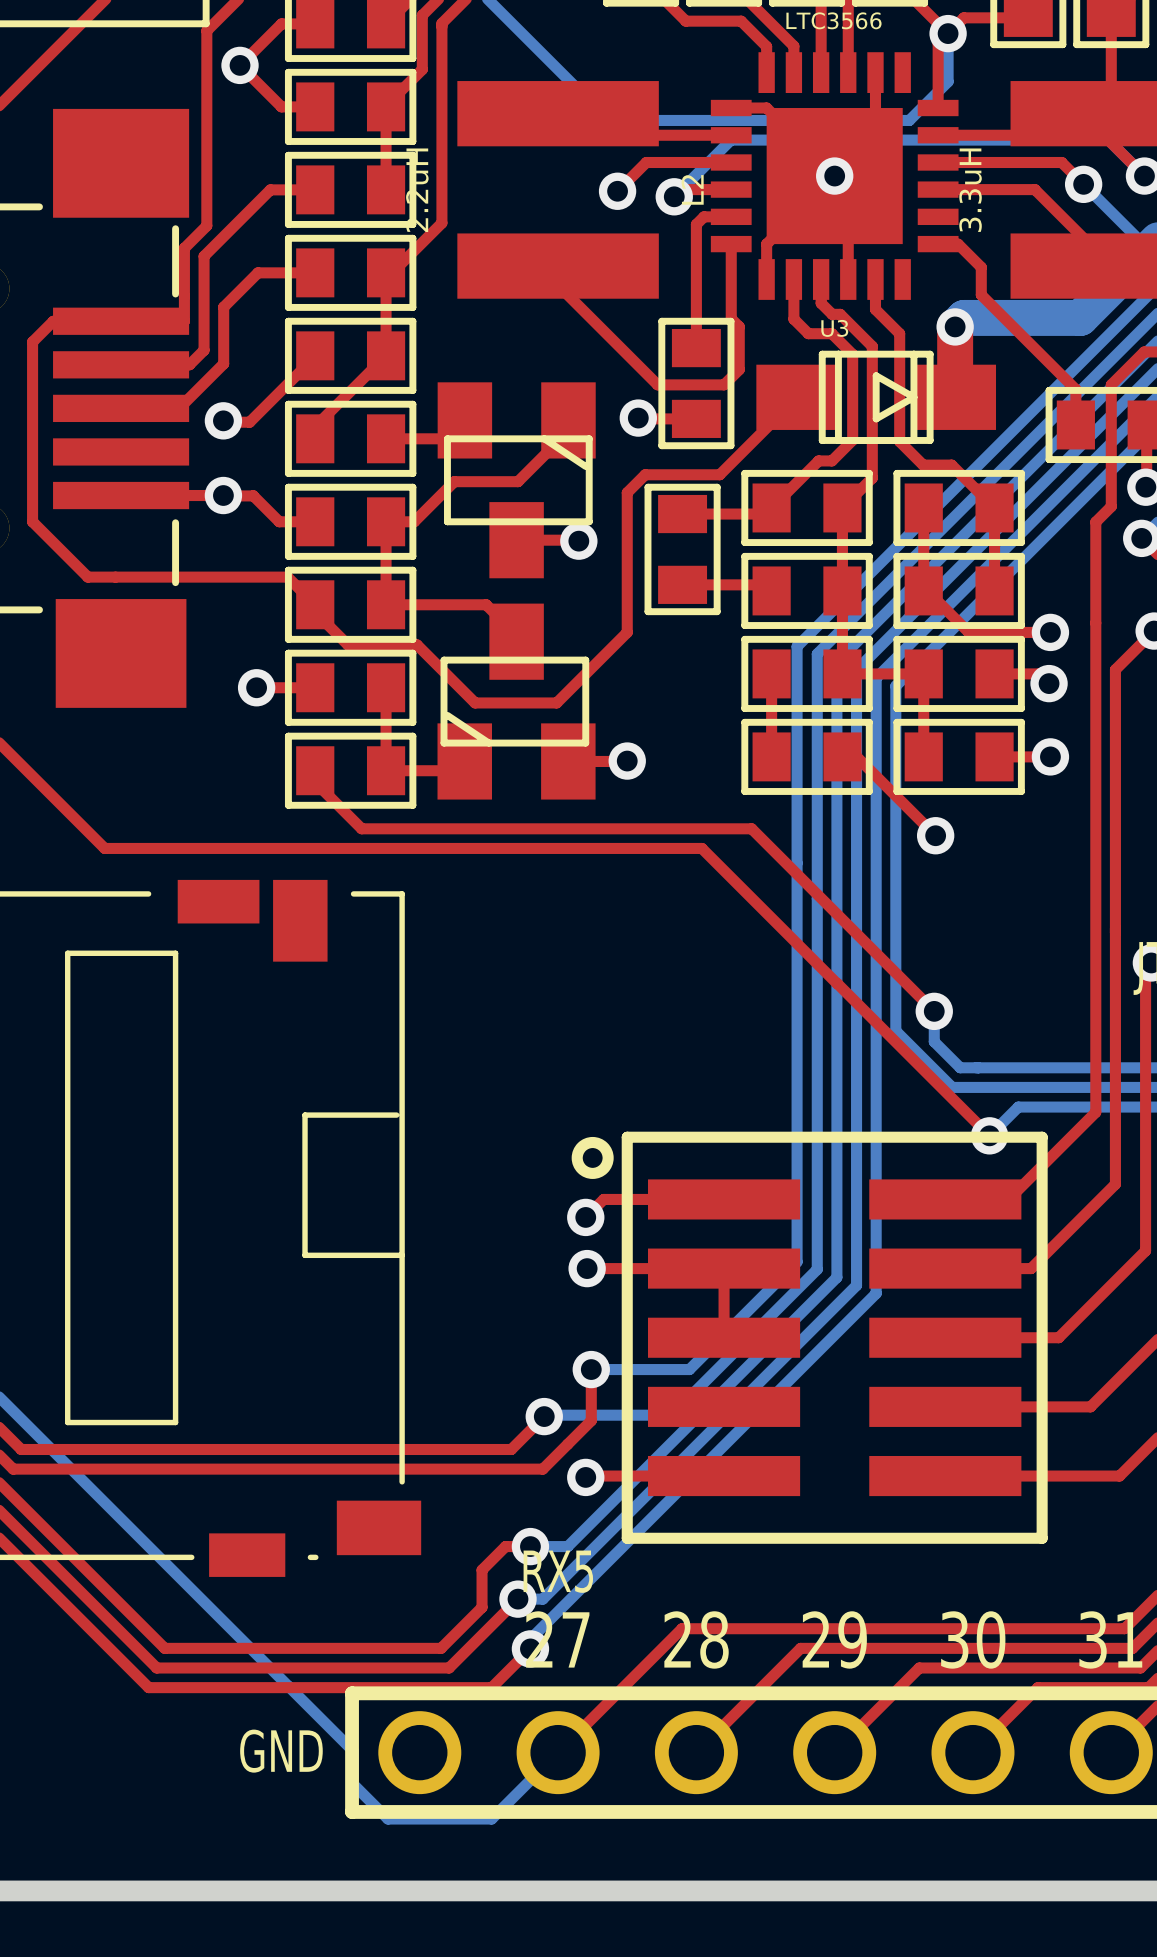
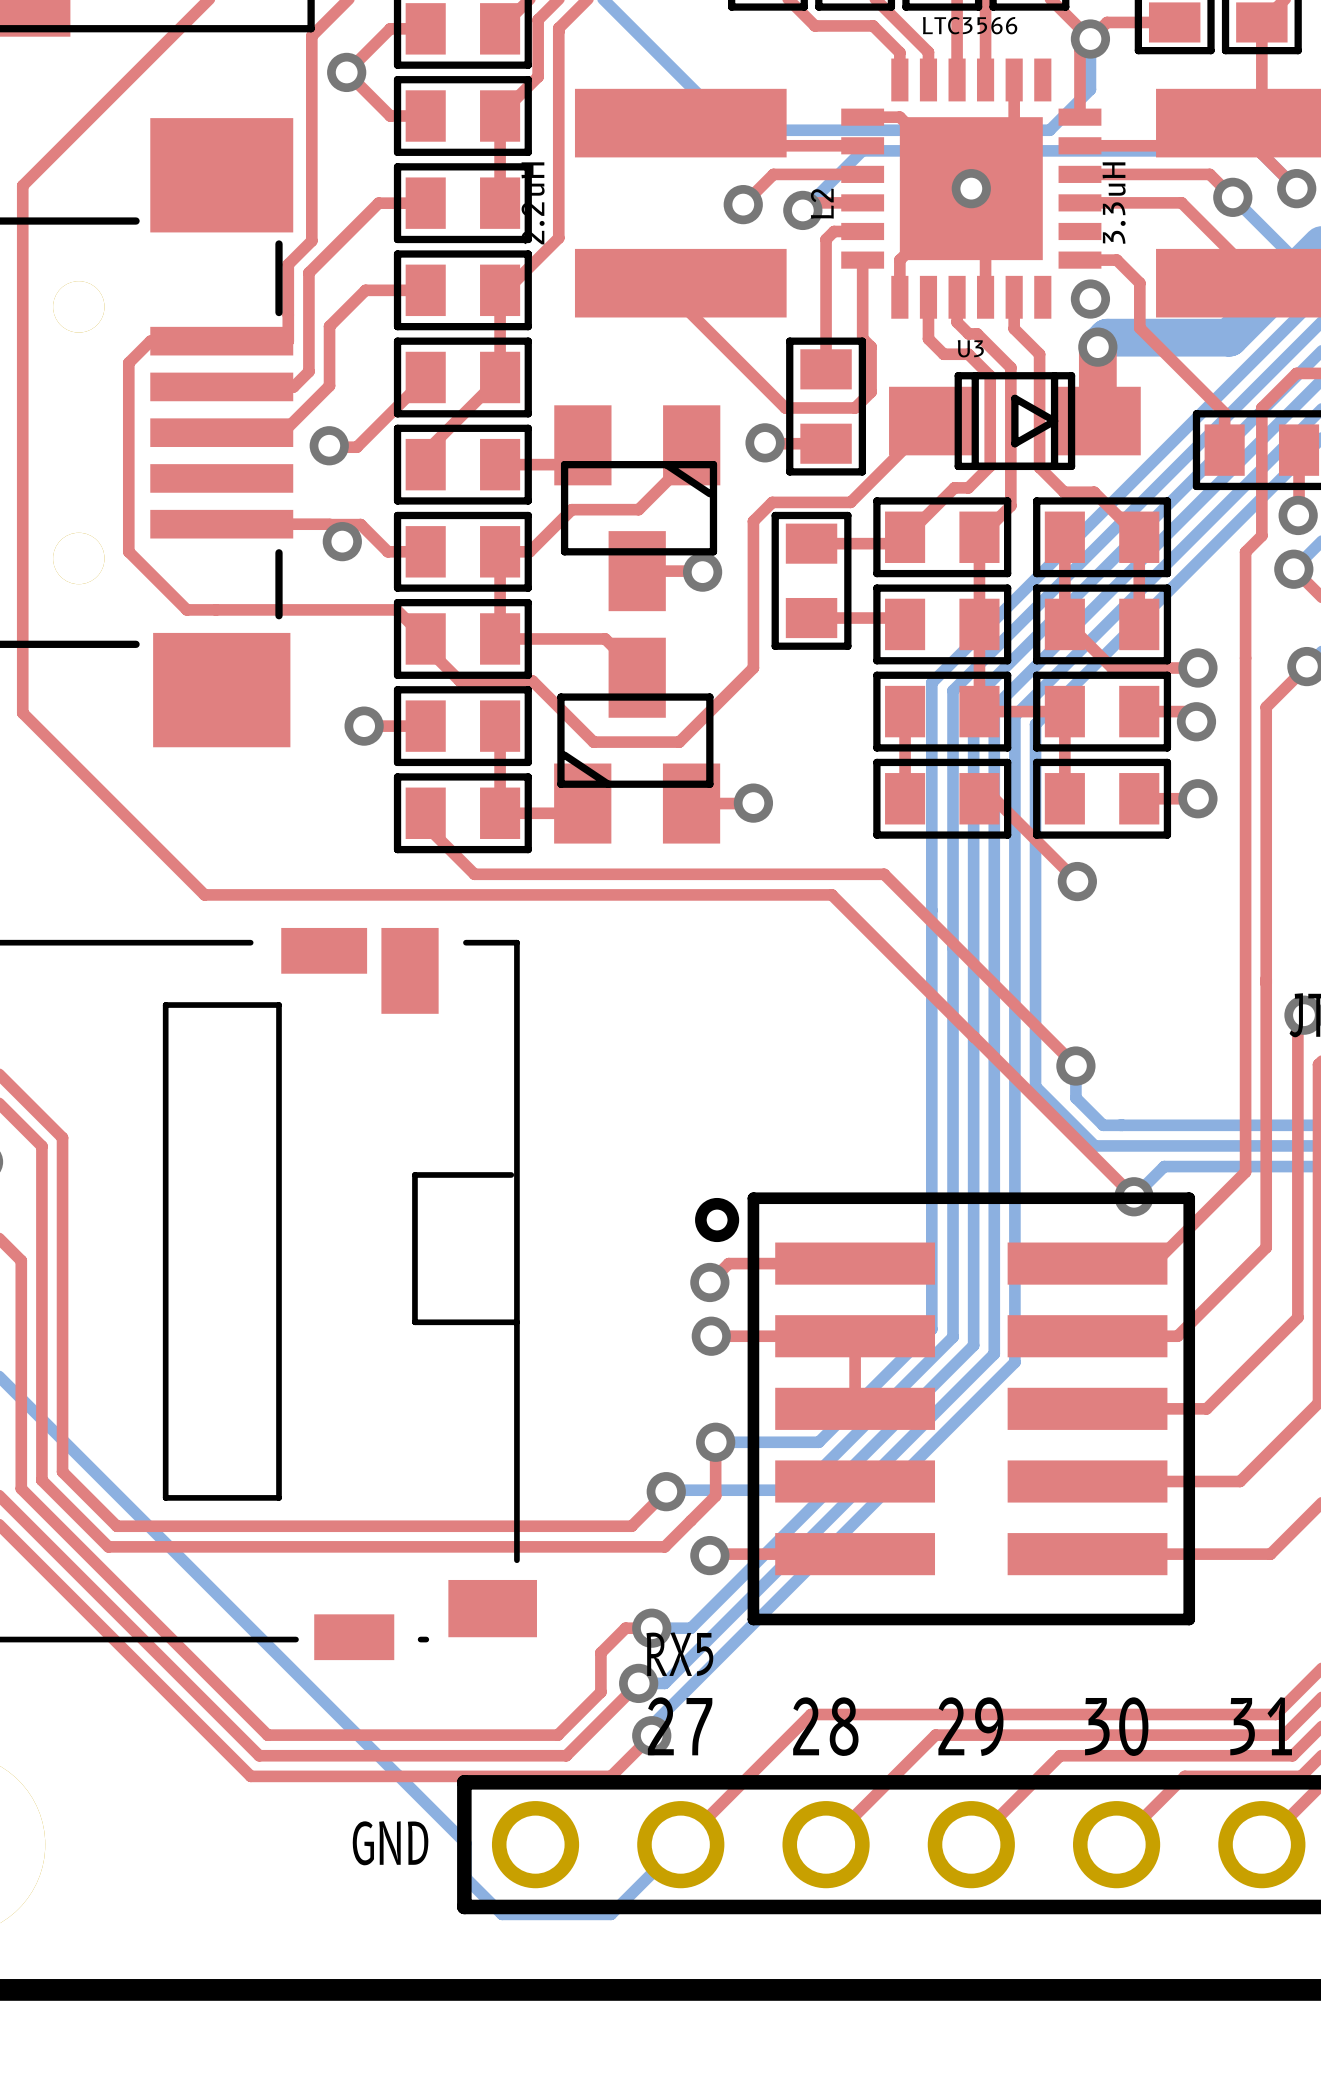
top track: (958, 244) (981, 267) (981, 294) (995, 308) -> (1100, 260) (1116, 260) (1139, 283) (1139, 328)
via: none -> (1090, 299)
via position: (223, 495) -> (342, 541)

